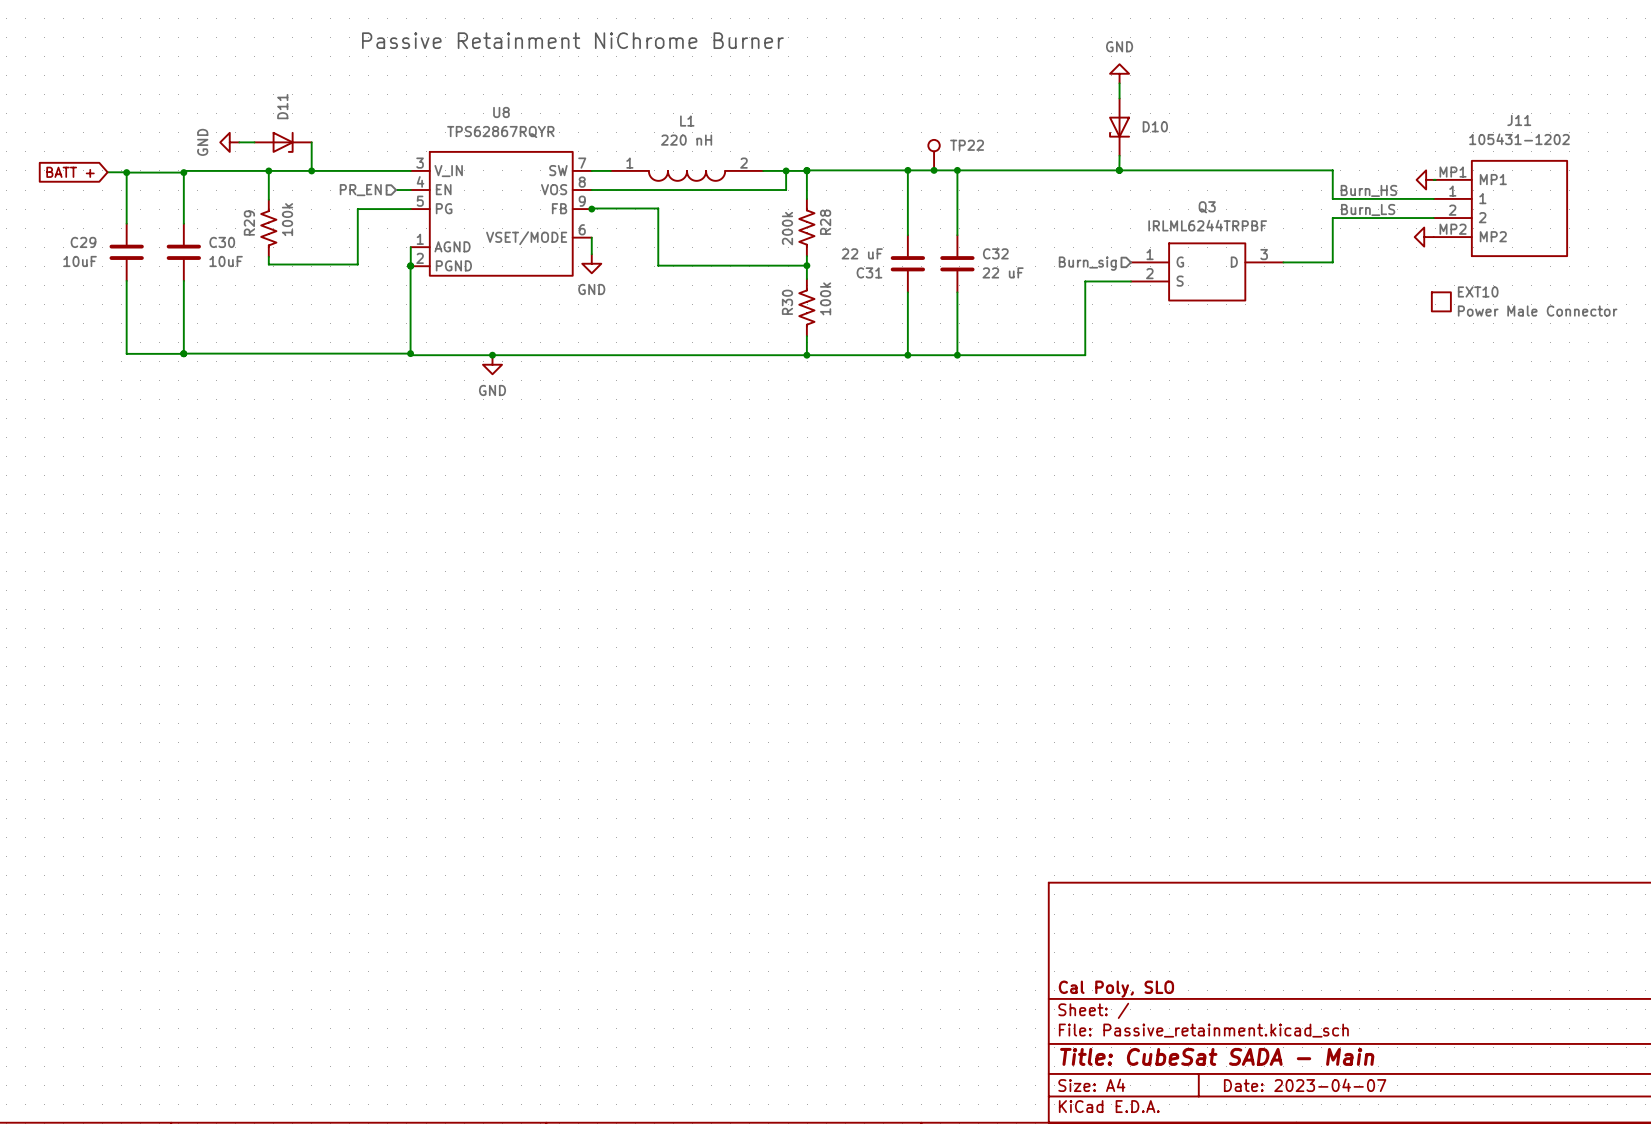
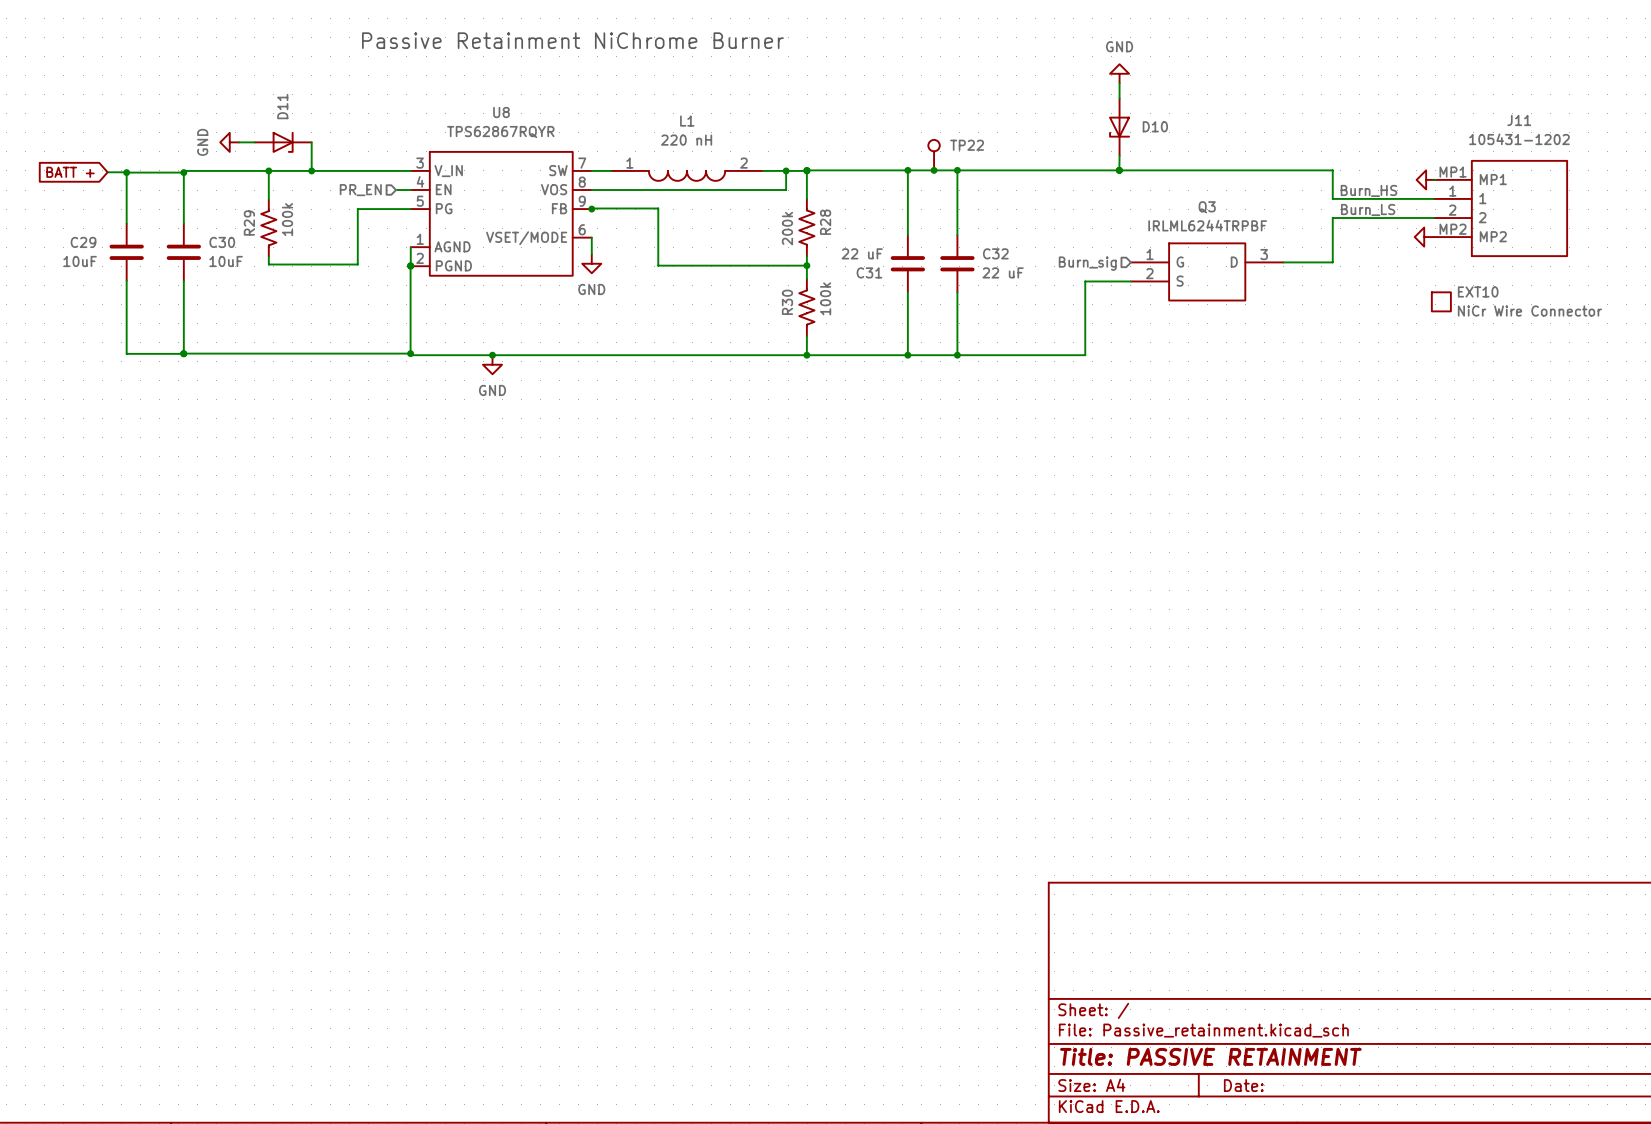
EXT10 value: Power Male Connector (1537, 311) -> NiCr Wire Connector (1529, 311)
title block: Cal Poly, SLO (1116, 989) -> none
title block: Title: CubeSat SADA - Main (1217, 1056) -> Title: PASSIVE RETAINMENT (1210, 1056)
title block: Date: 2023-04-07 (1305, 1085) -> Date: (1243, 1085)

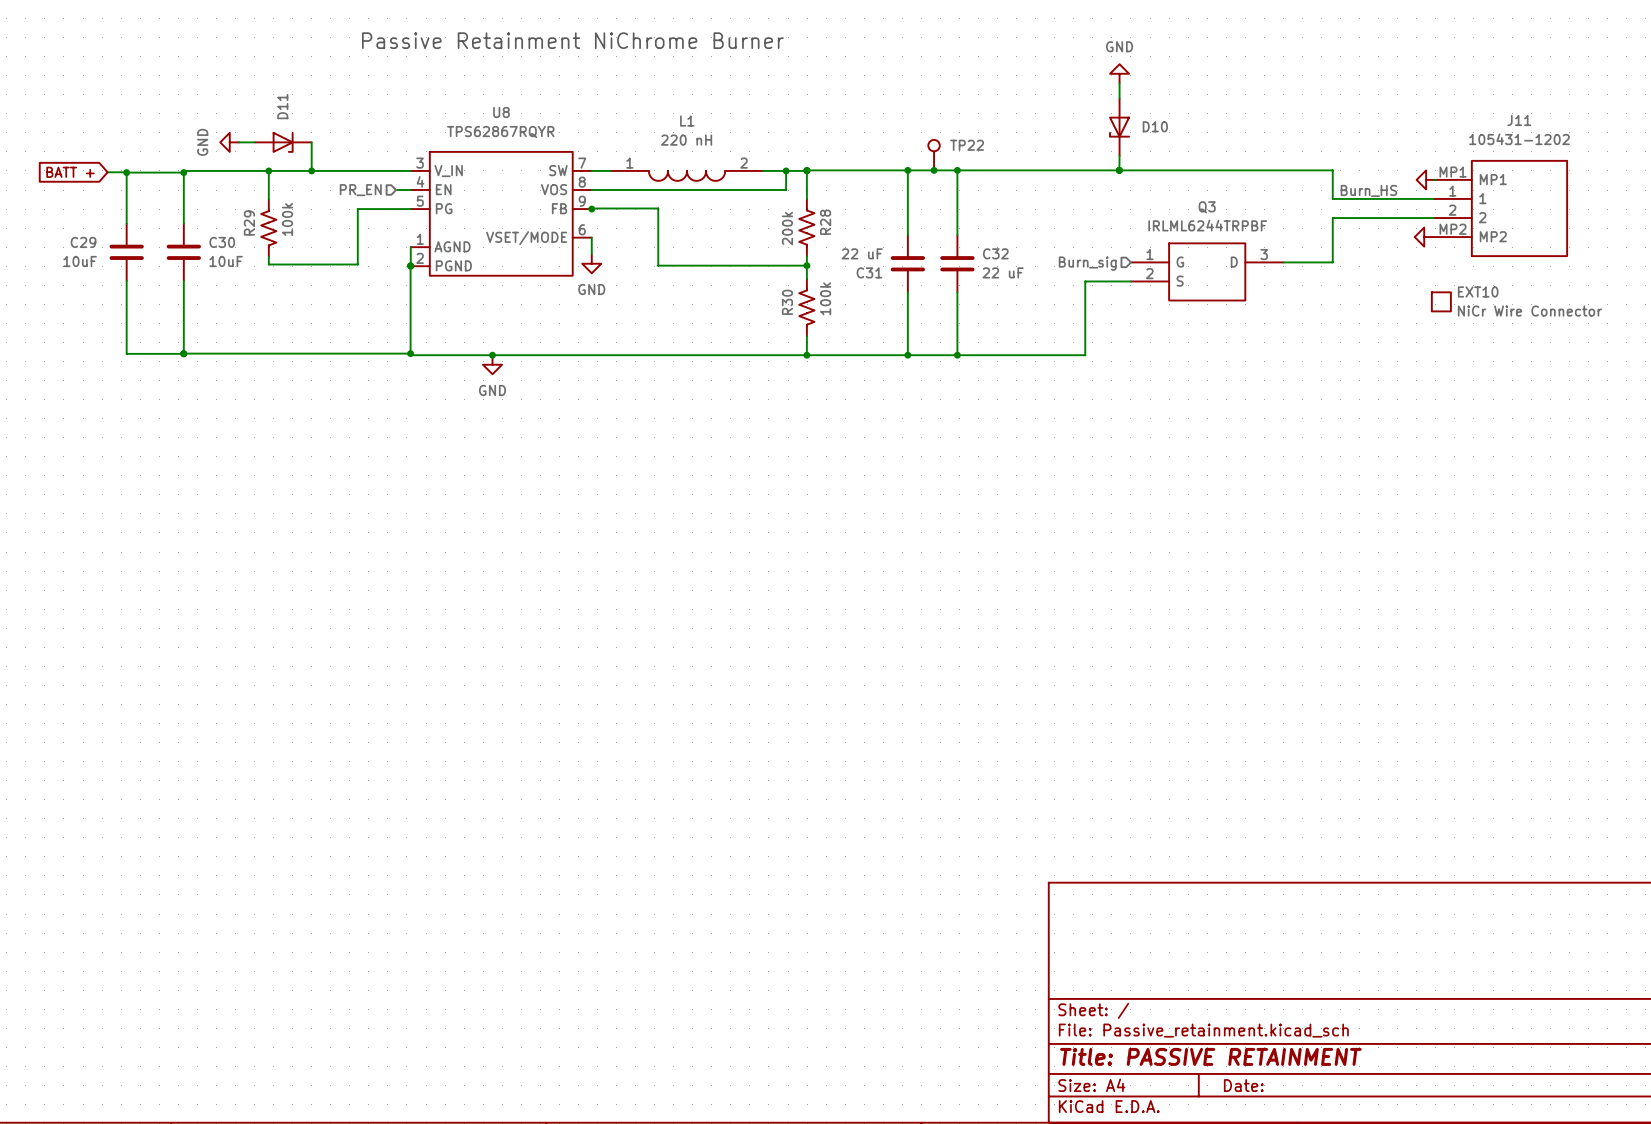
label: Burn_LS (1368, 209) -> none

